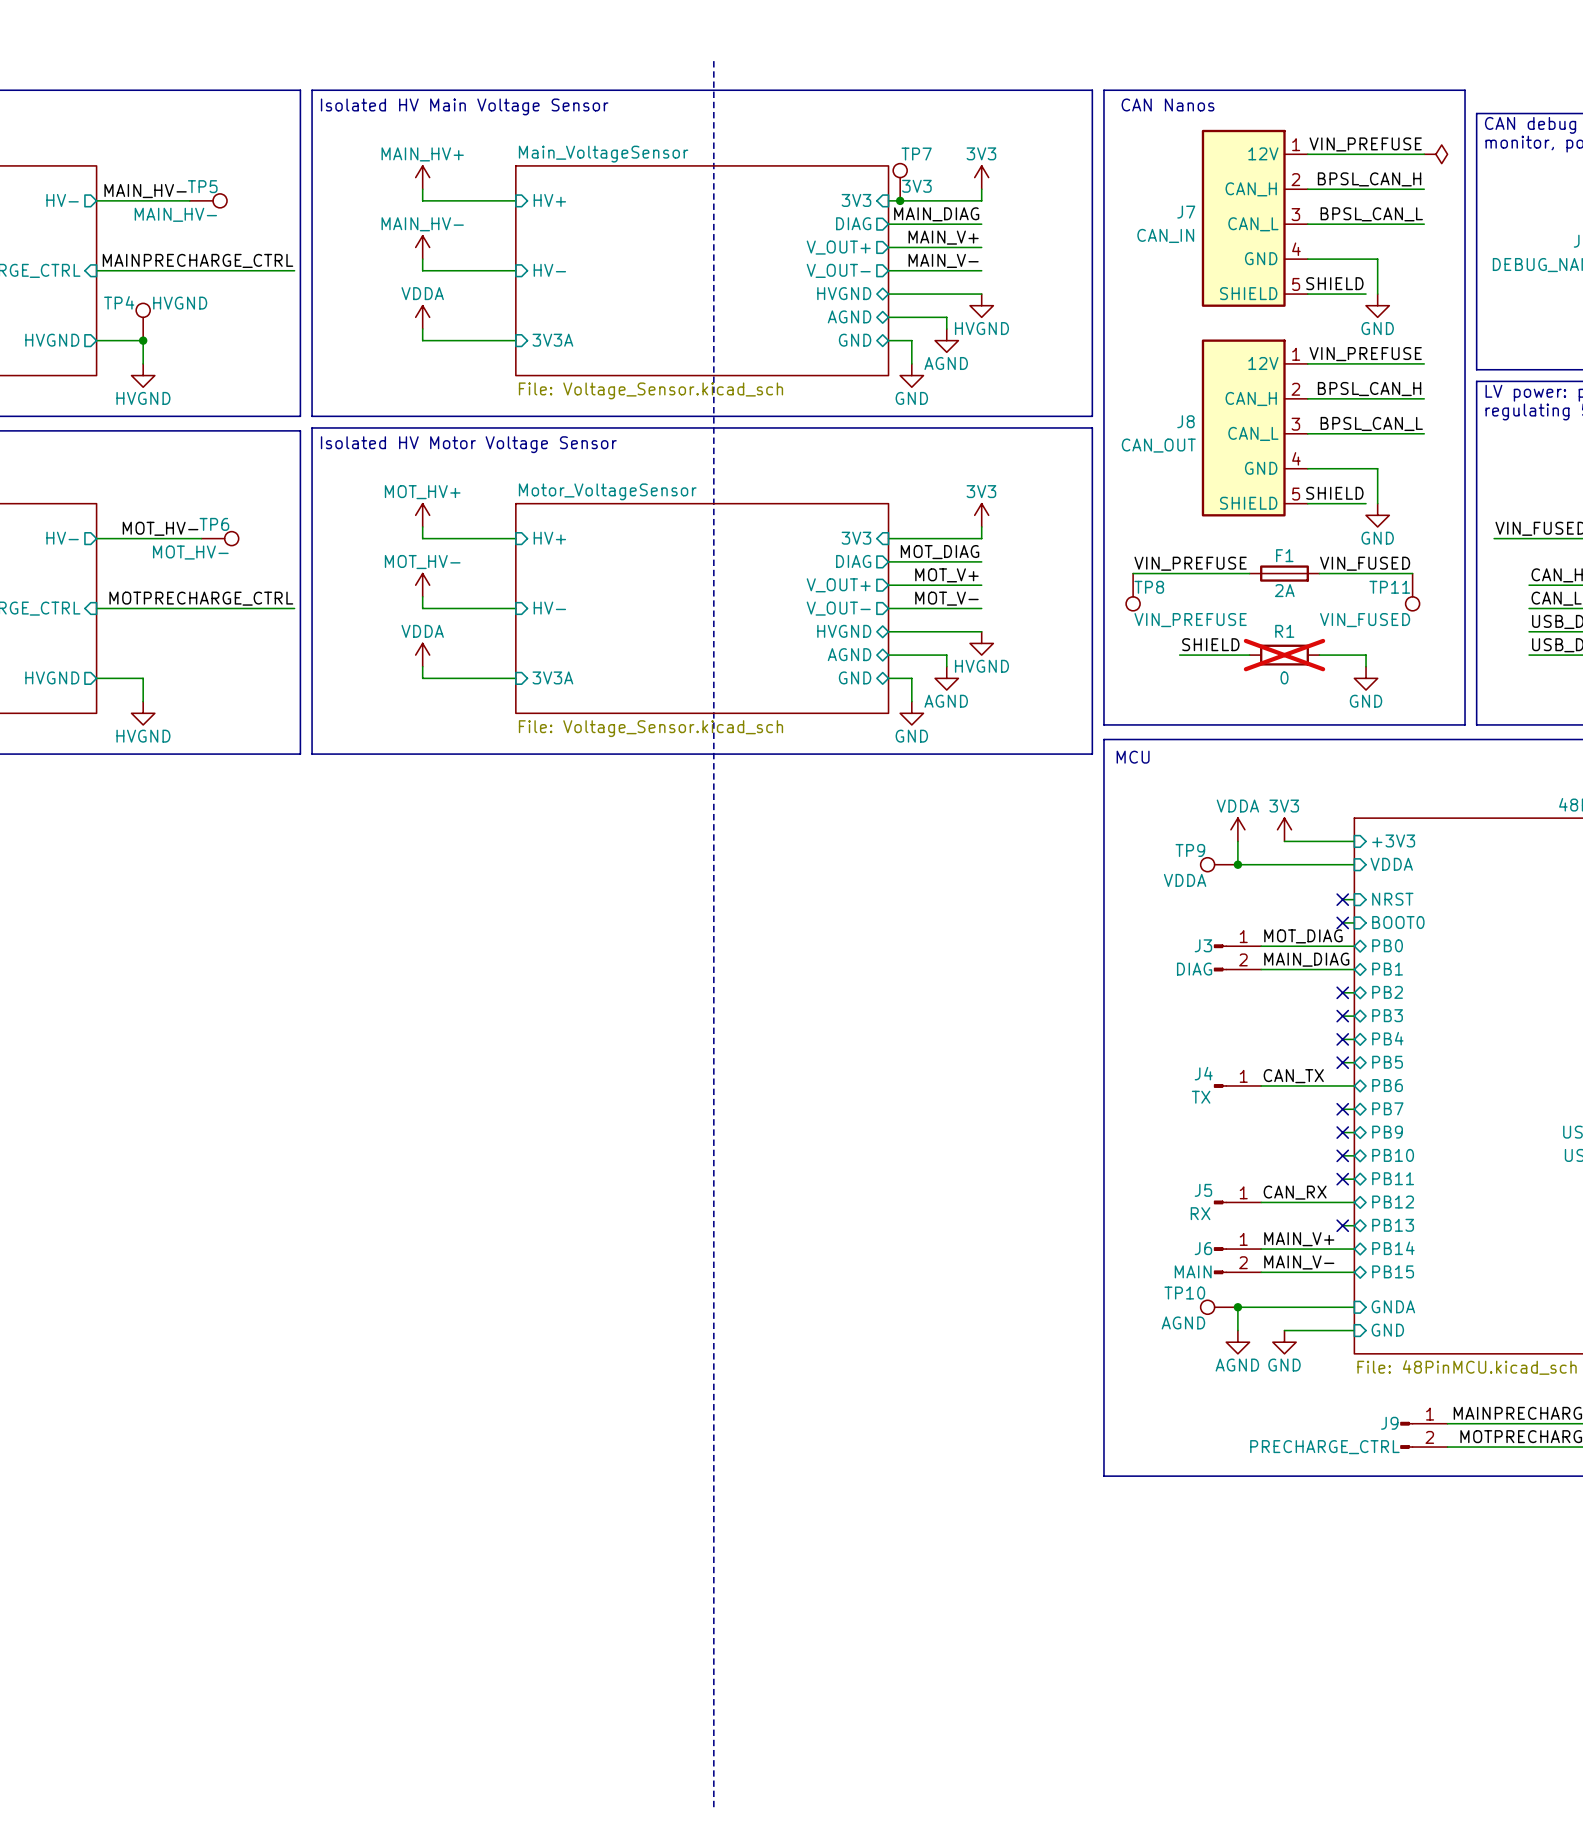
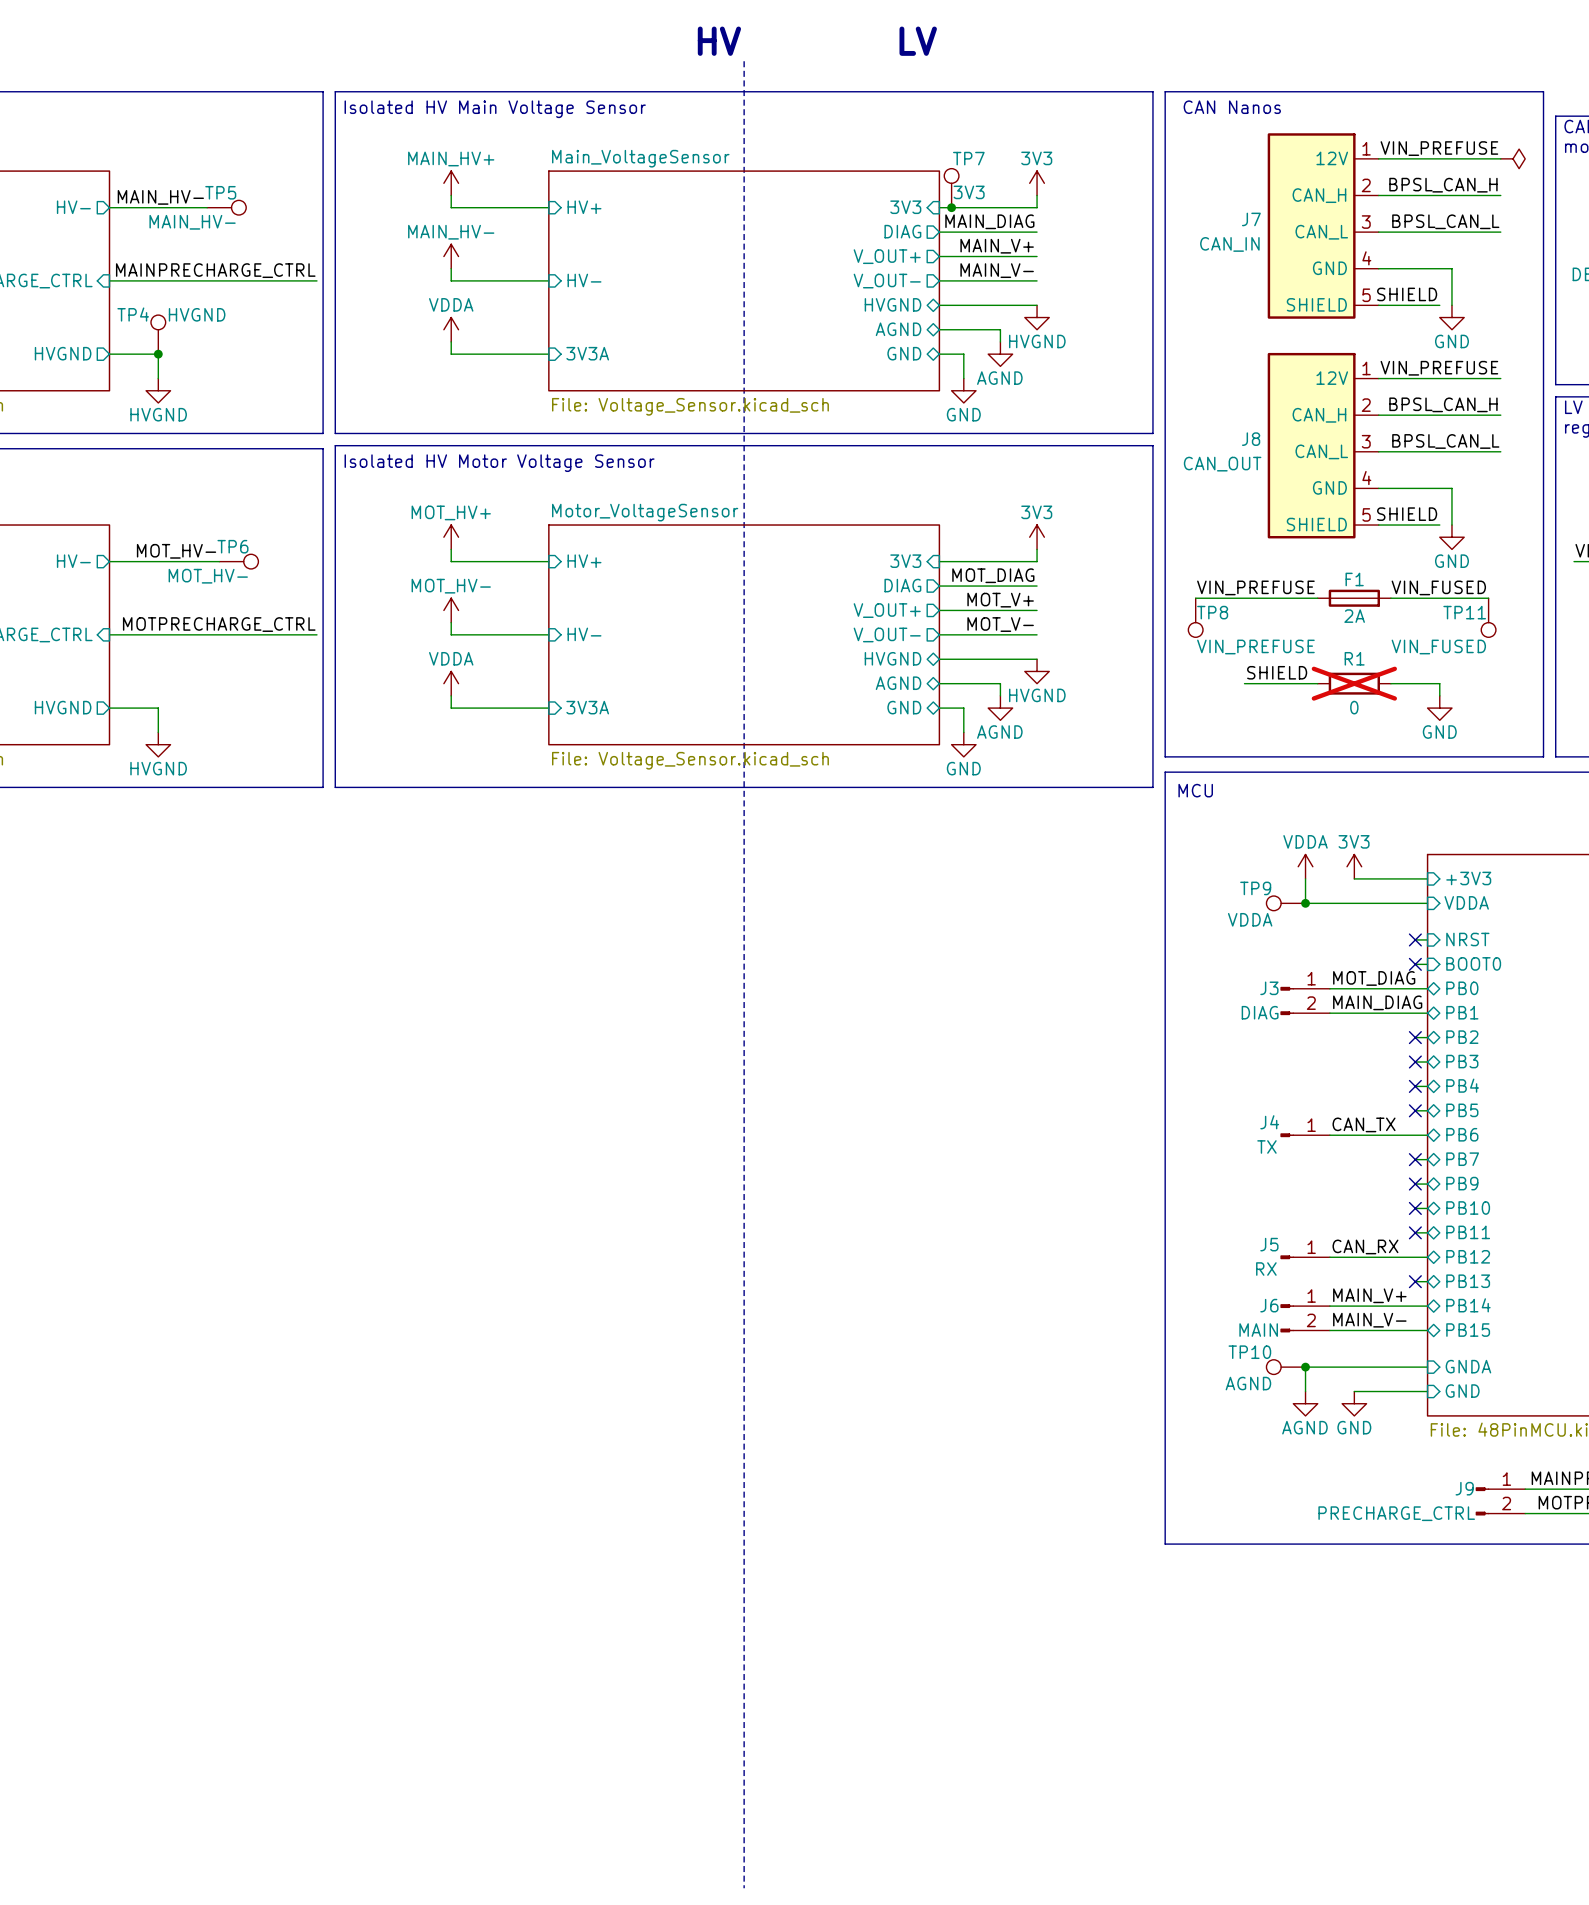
text: none -> HV (719, 41)
text: none -> LV (918, 41)
line: none -> (744, 61) (744, 1888)
line: (713, 61) (713, 1808) -> none

